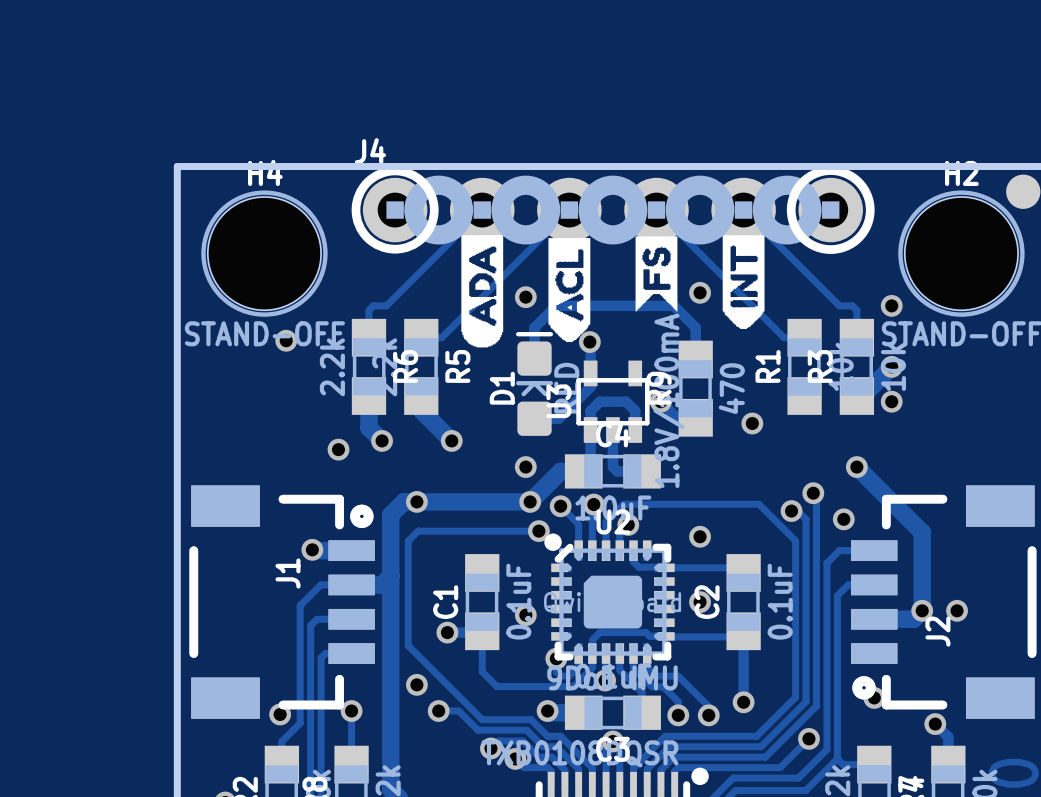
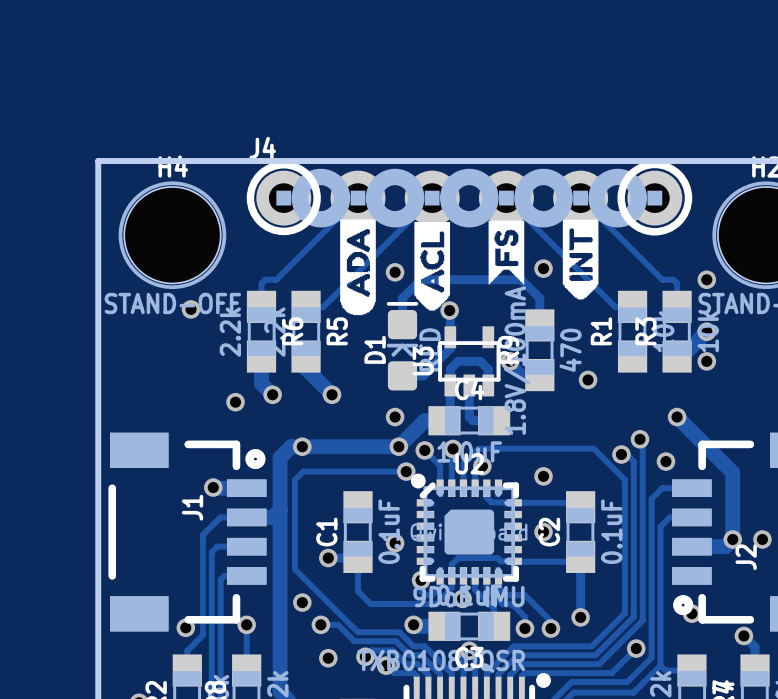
via: none -> (328, 658)

